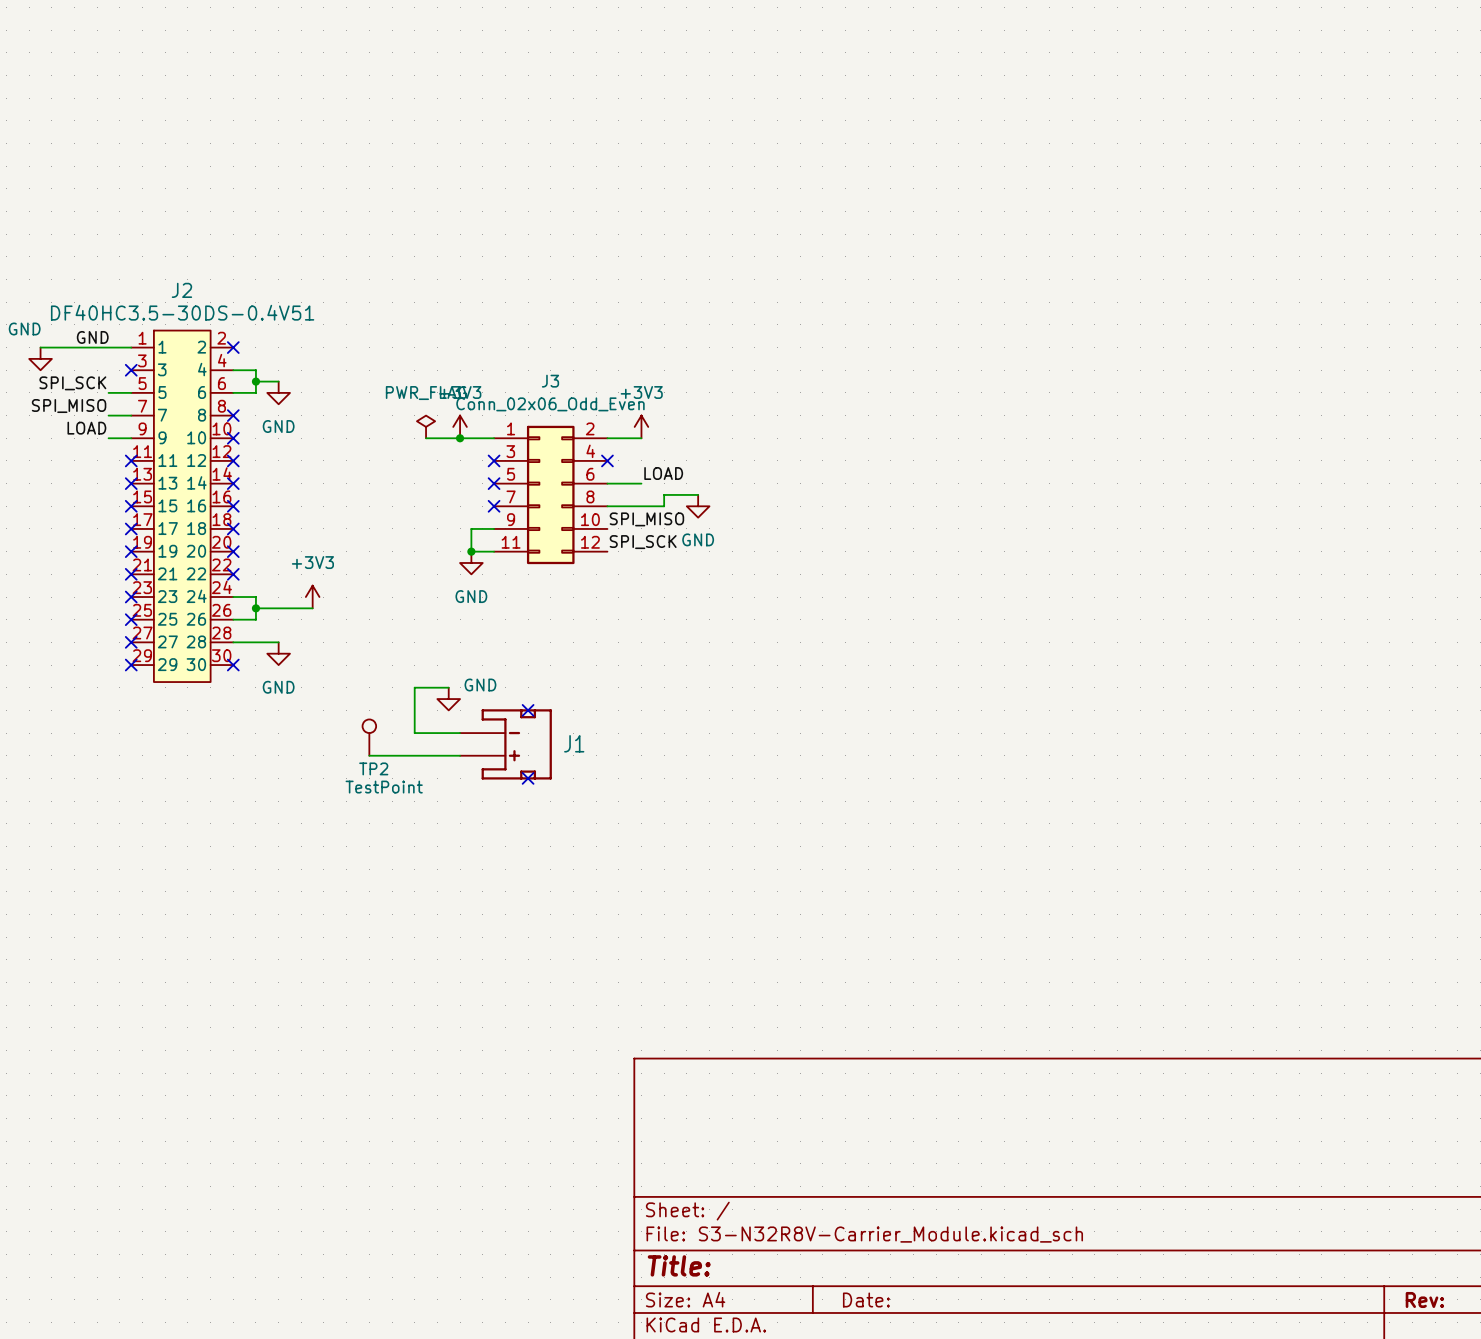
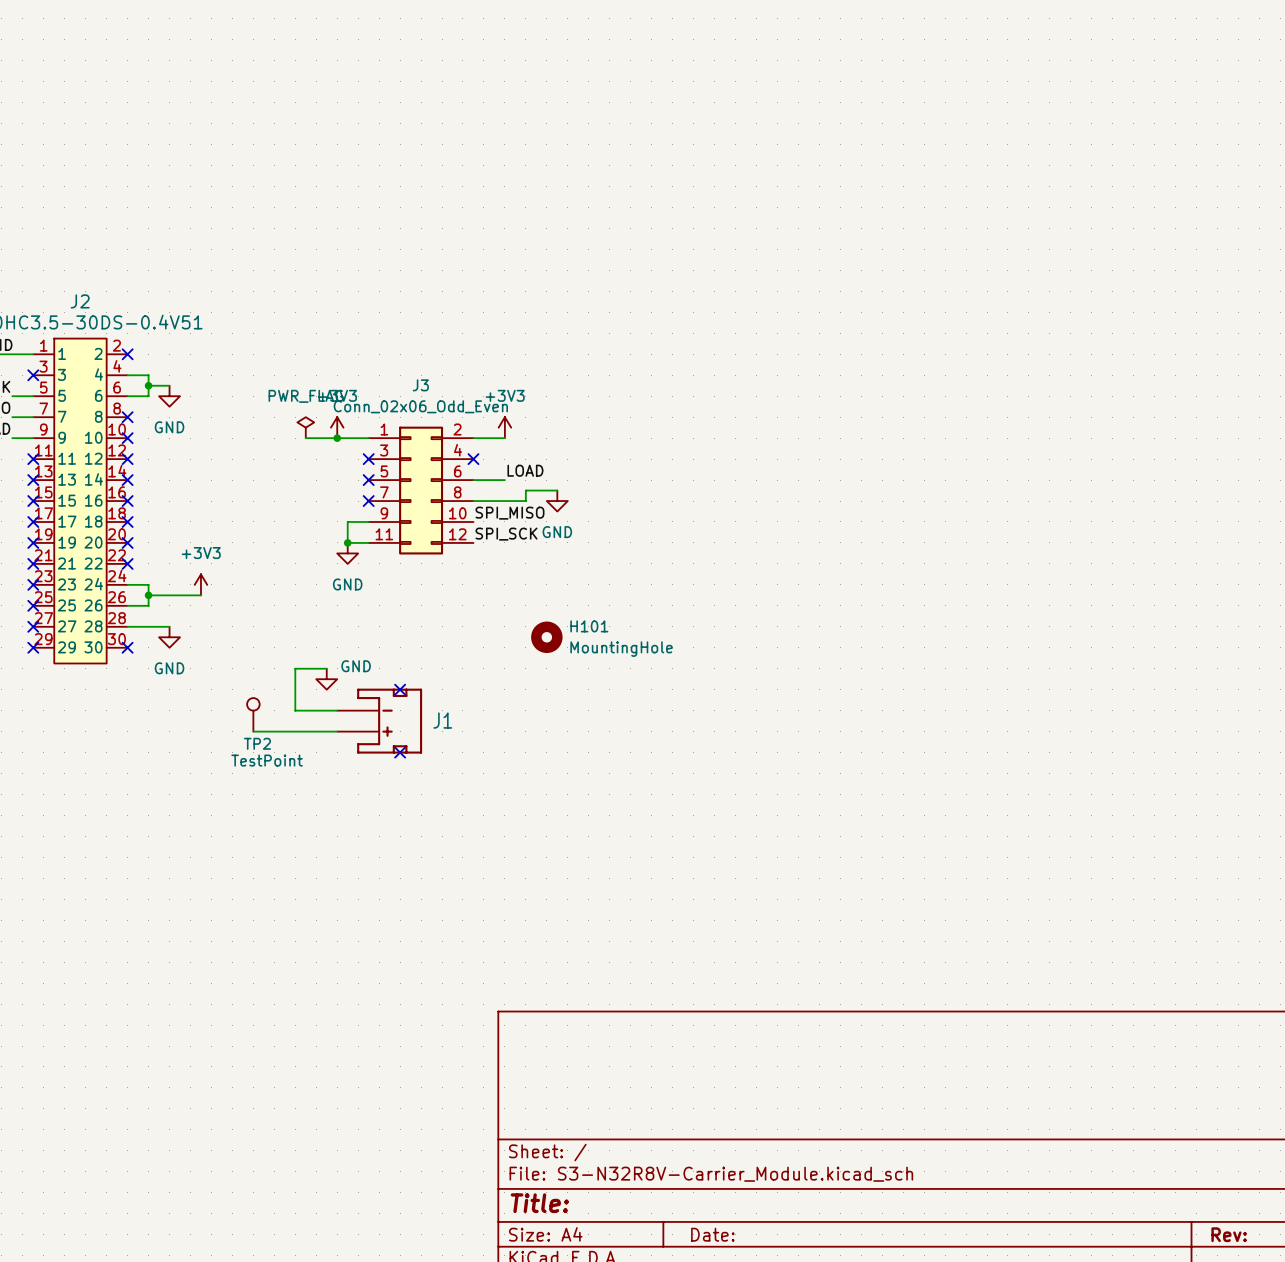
H101: none -> MountingHole (546, 637)

